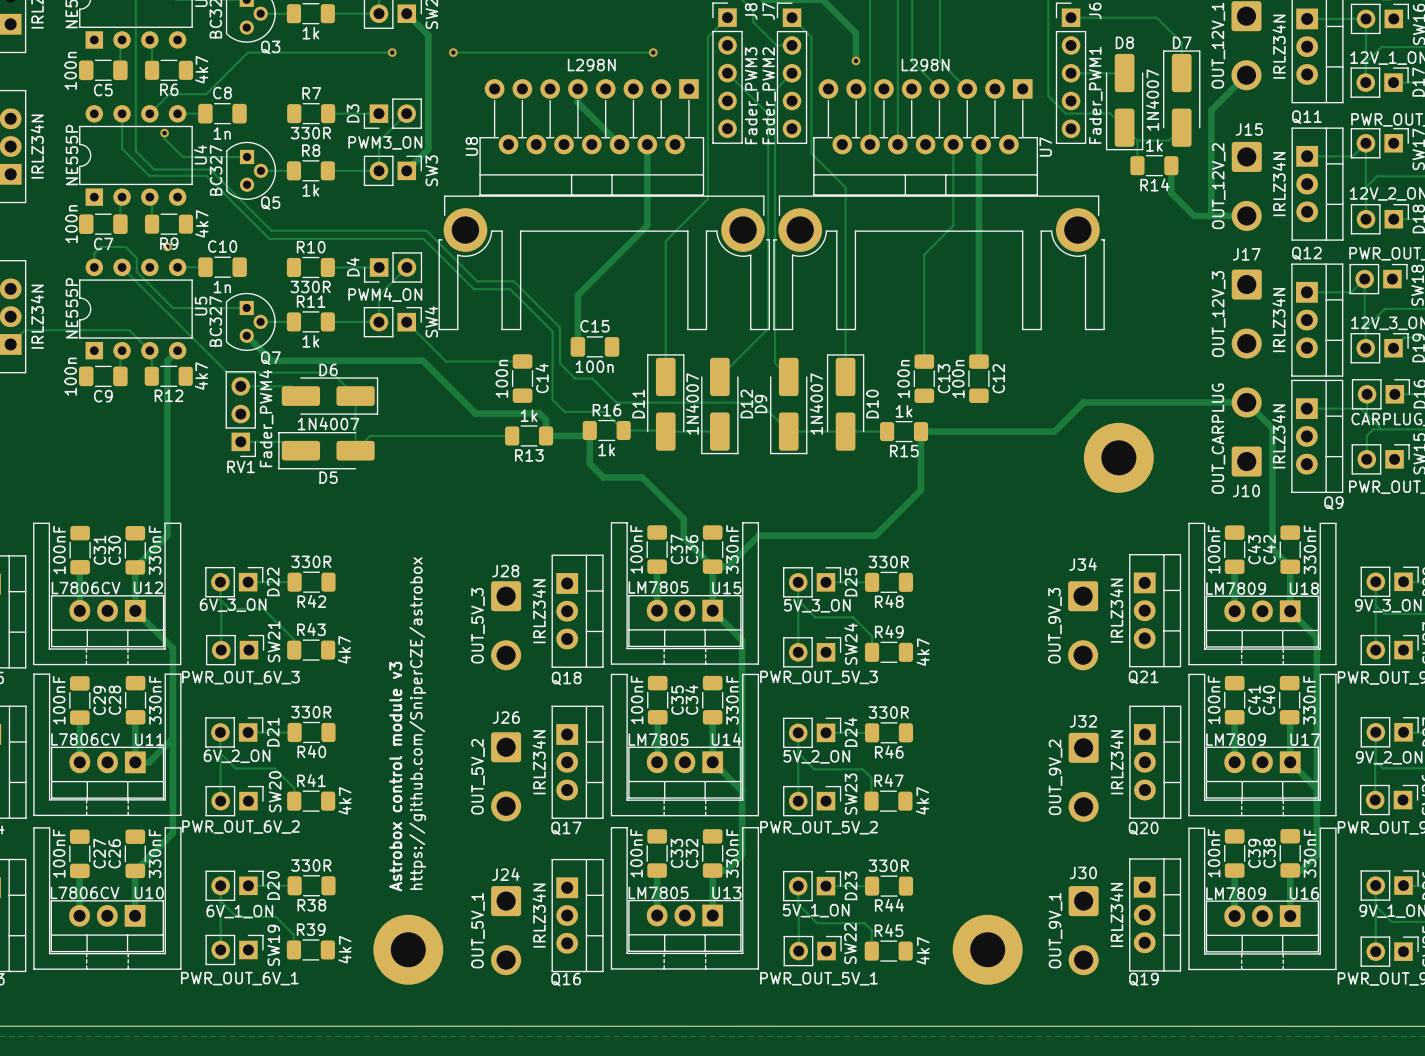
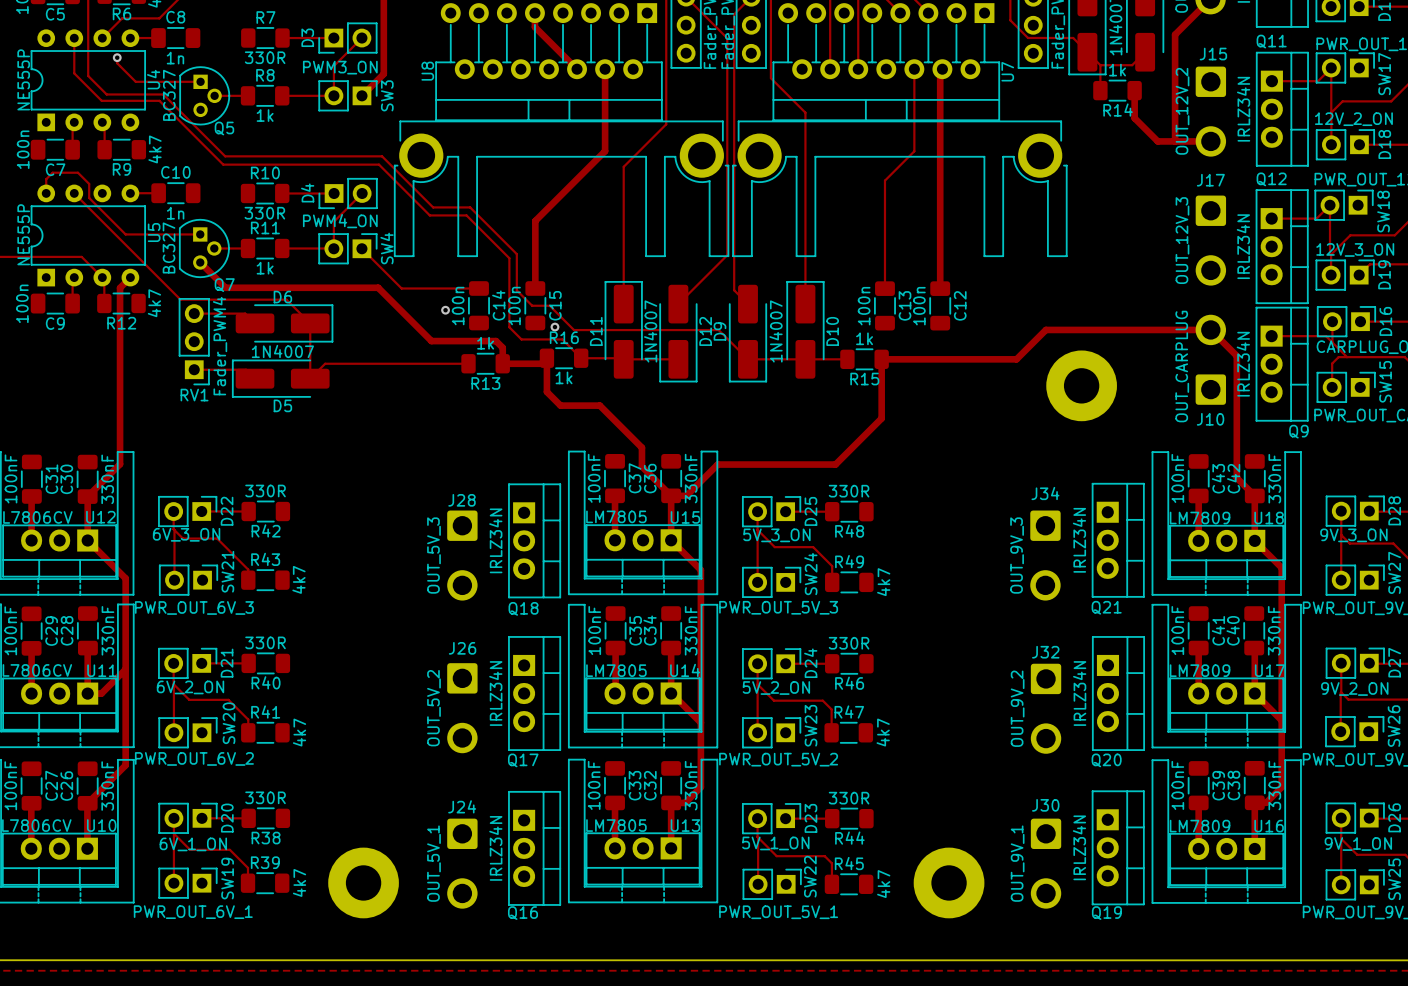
via: (167, 246) -> none
track: (578, 294) (577, 346) -> (535, 220) (535, 288)
C15 rotation: 0° (594, 346) -> 90° clockwise (535, 305)
C15 position: (594, 346) -> (535, 305)
via: none -> (445, 310)
via: none -> (554, 327)
text: https://github.com/SniperCZE/astrobox (417, 723) -> none
text: Astrobox control module v3 (395, 776) -> none

